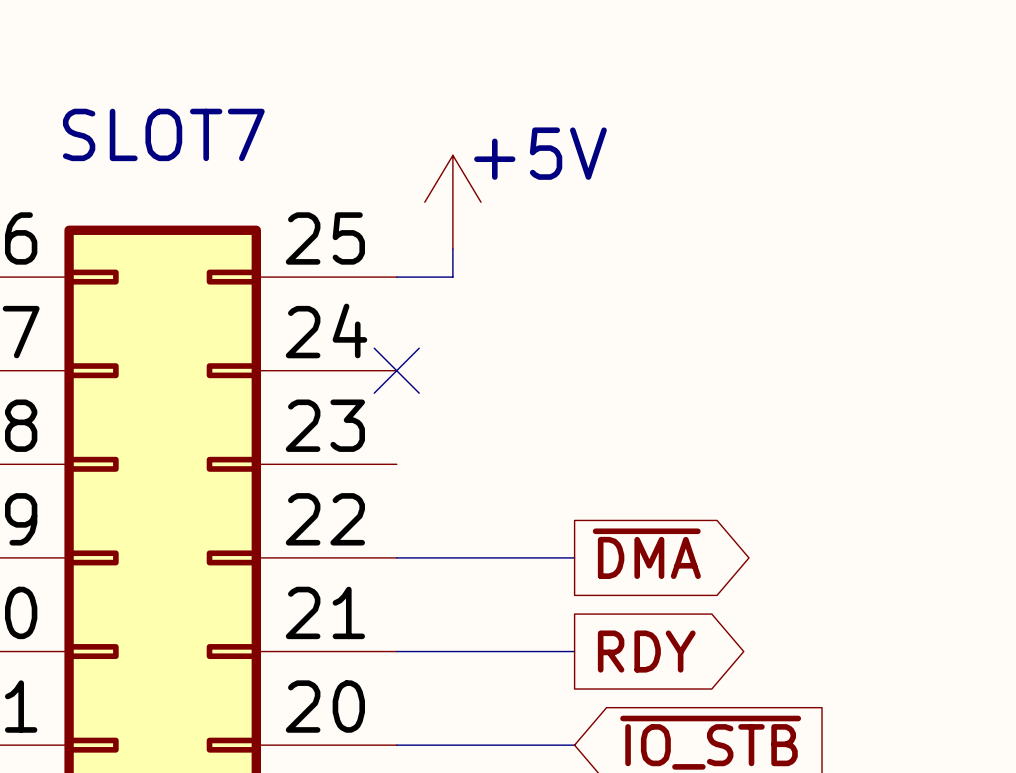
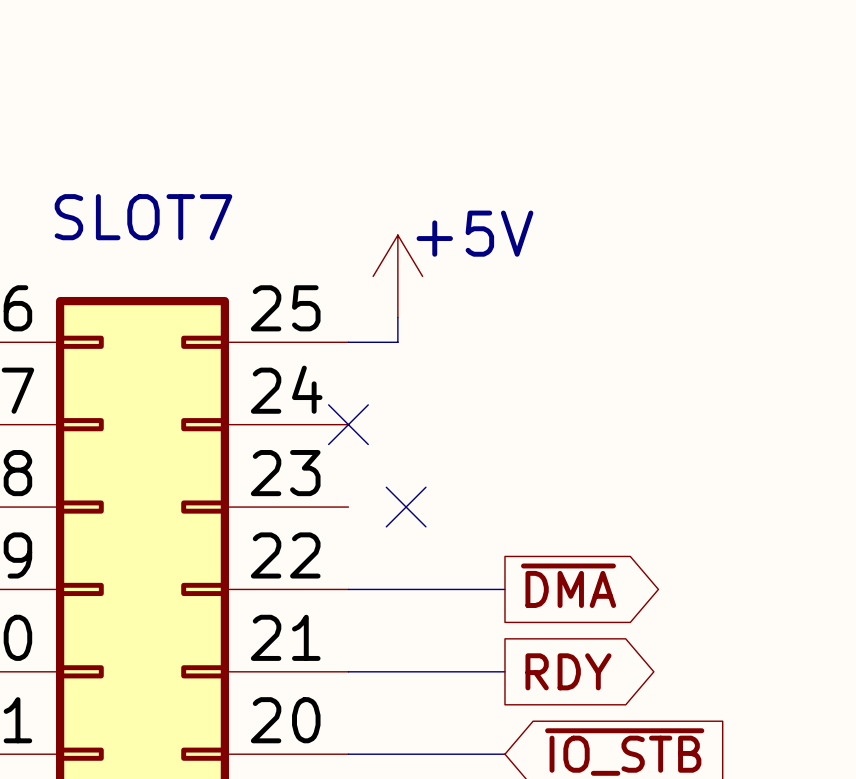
no-connect mark: none -> (406, 507)

